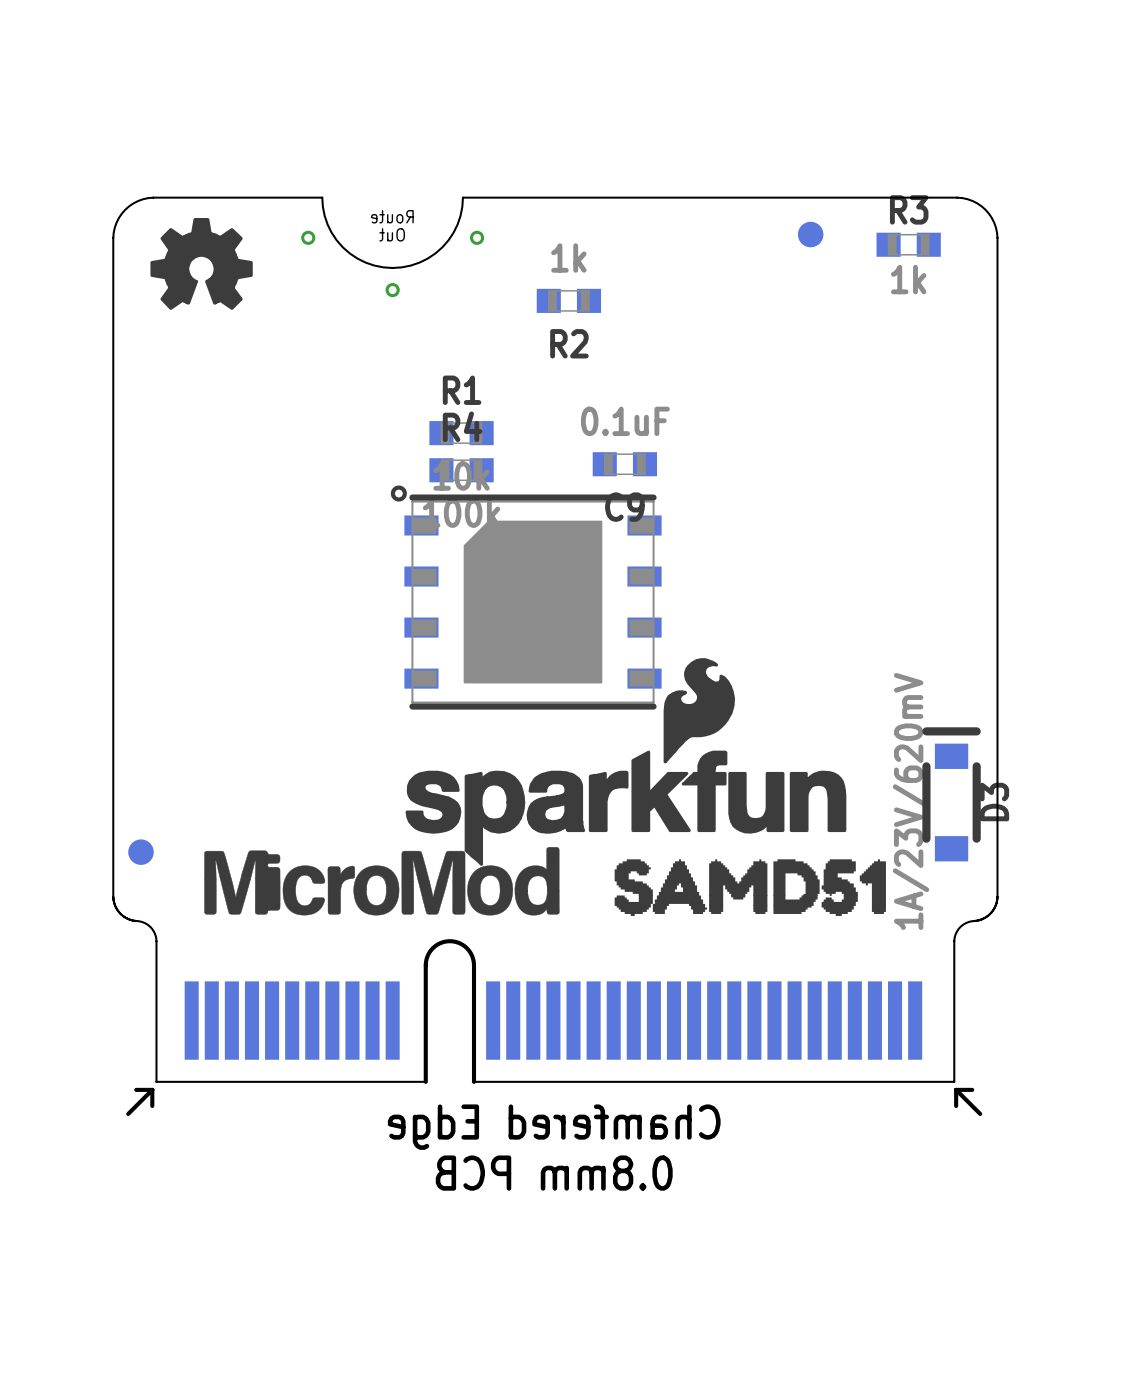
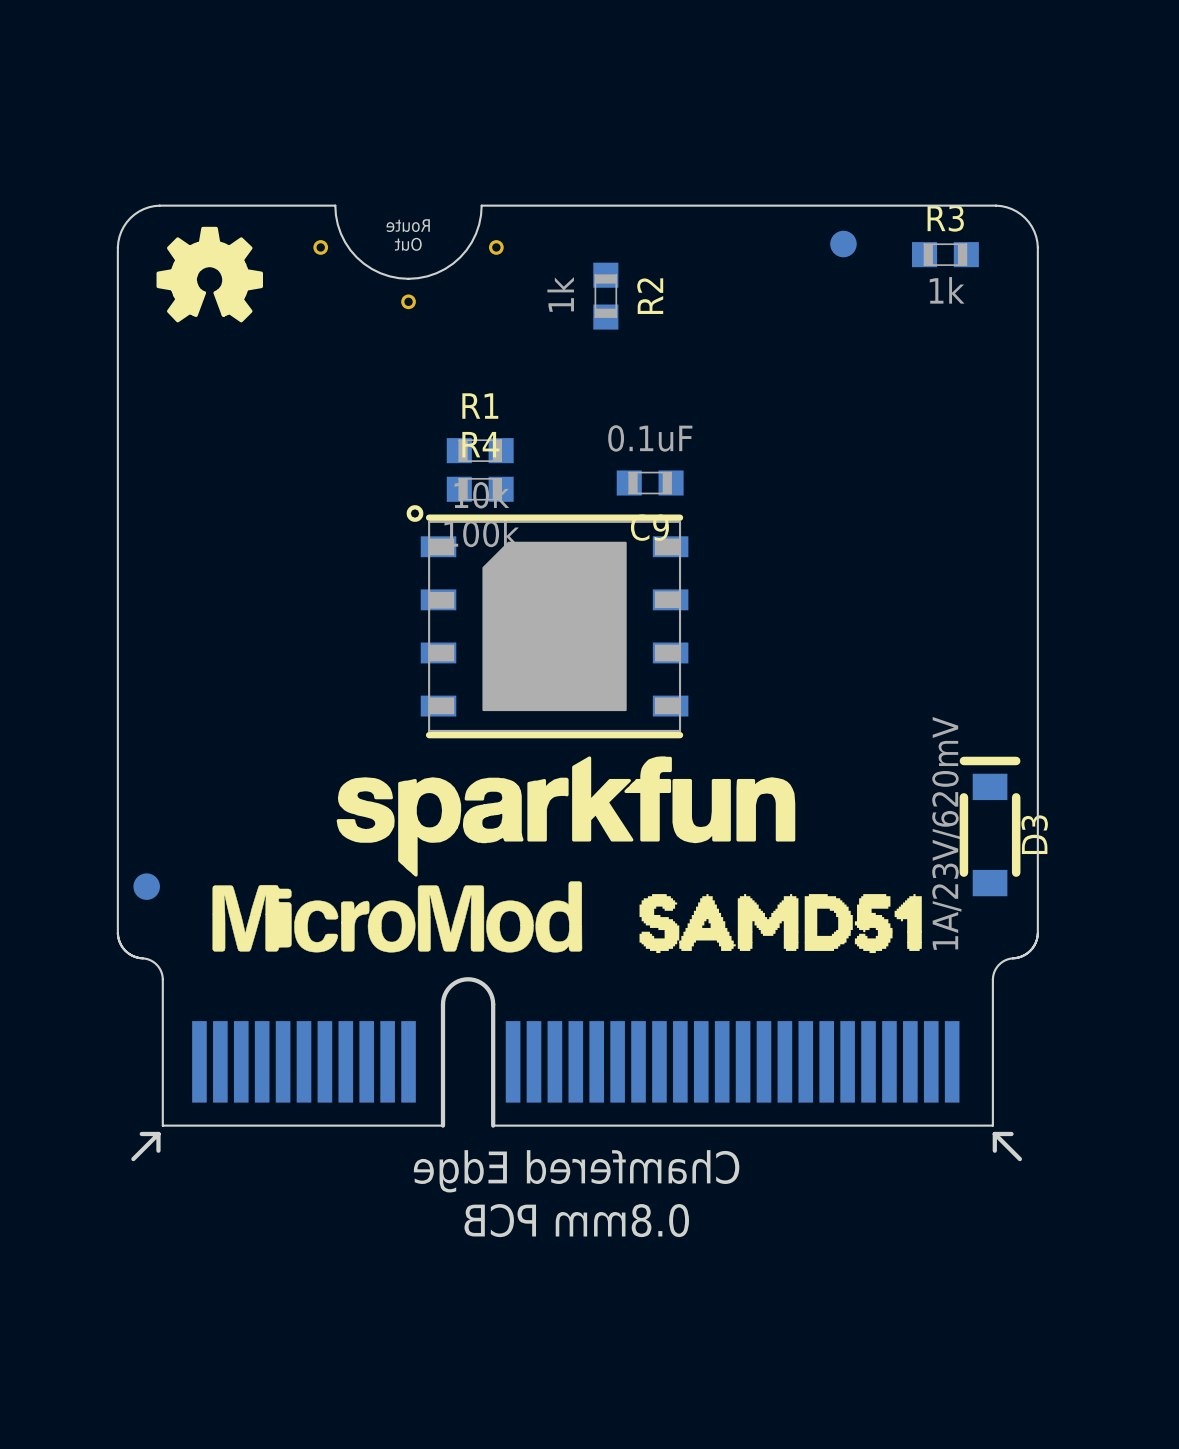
R2 rotation: 0° (568, 300) -> 90° clockwise (605, 296)
drawing: [405, 658, 847, 866] -> none
drawing: none -> [336, 756, 796, 877]

